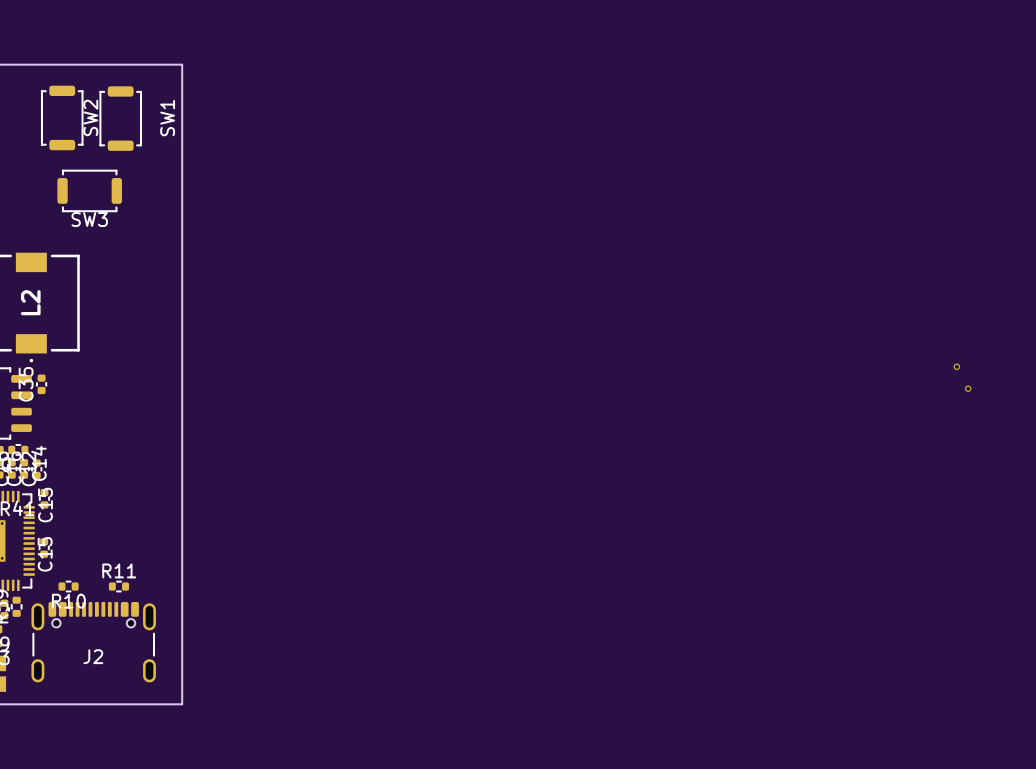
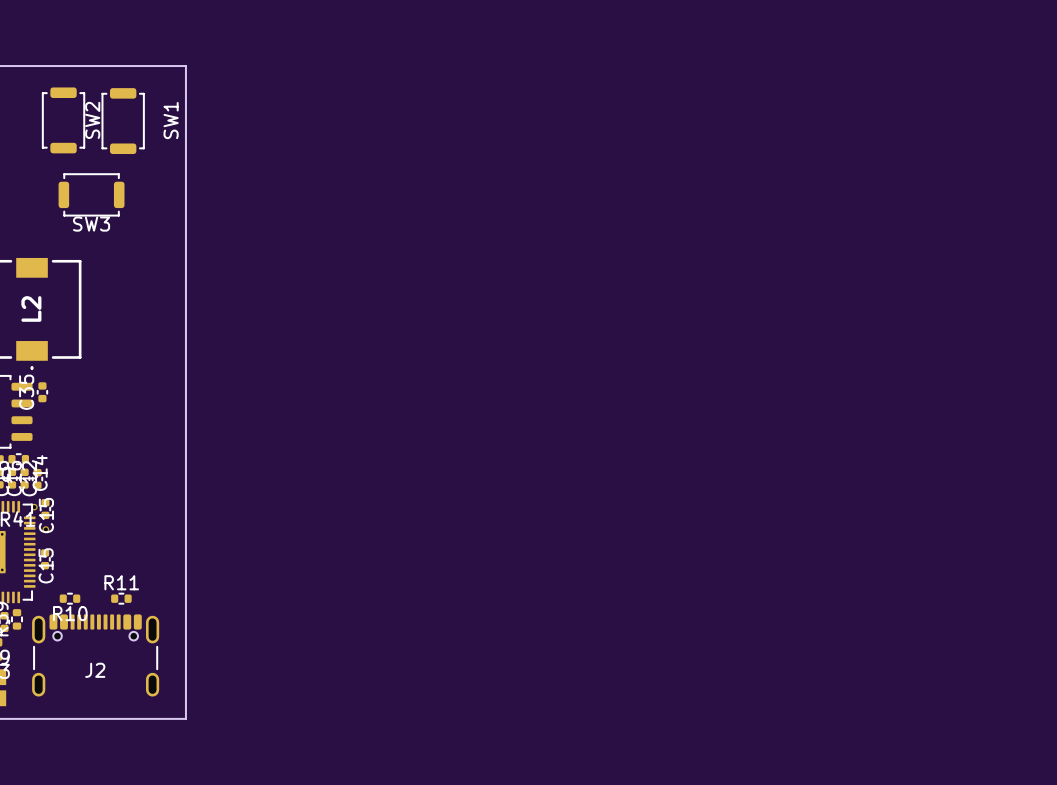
via: (956, 366) -> none
via: (968, 388) -> none
via: none -> (34, 507)
via: none -> (45, 529)

